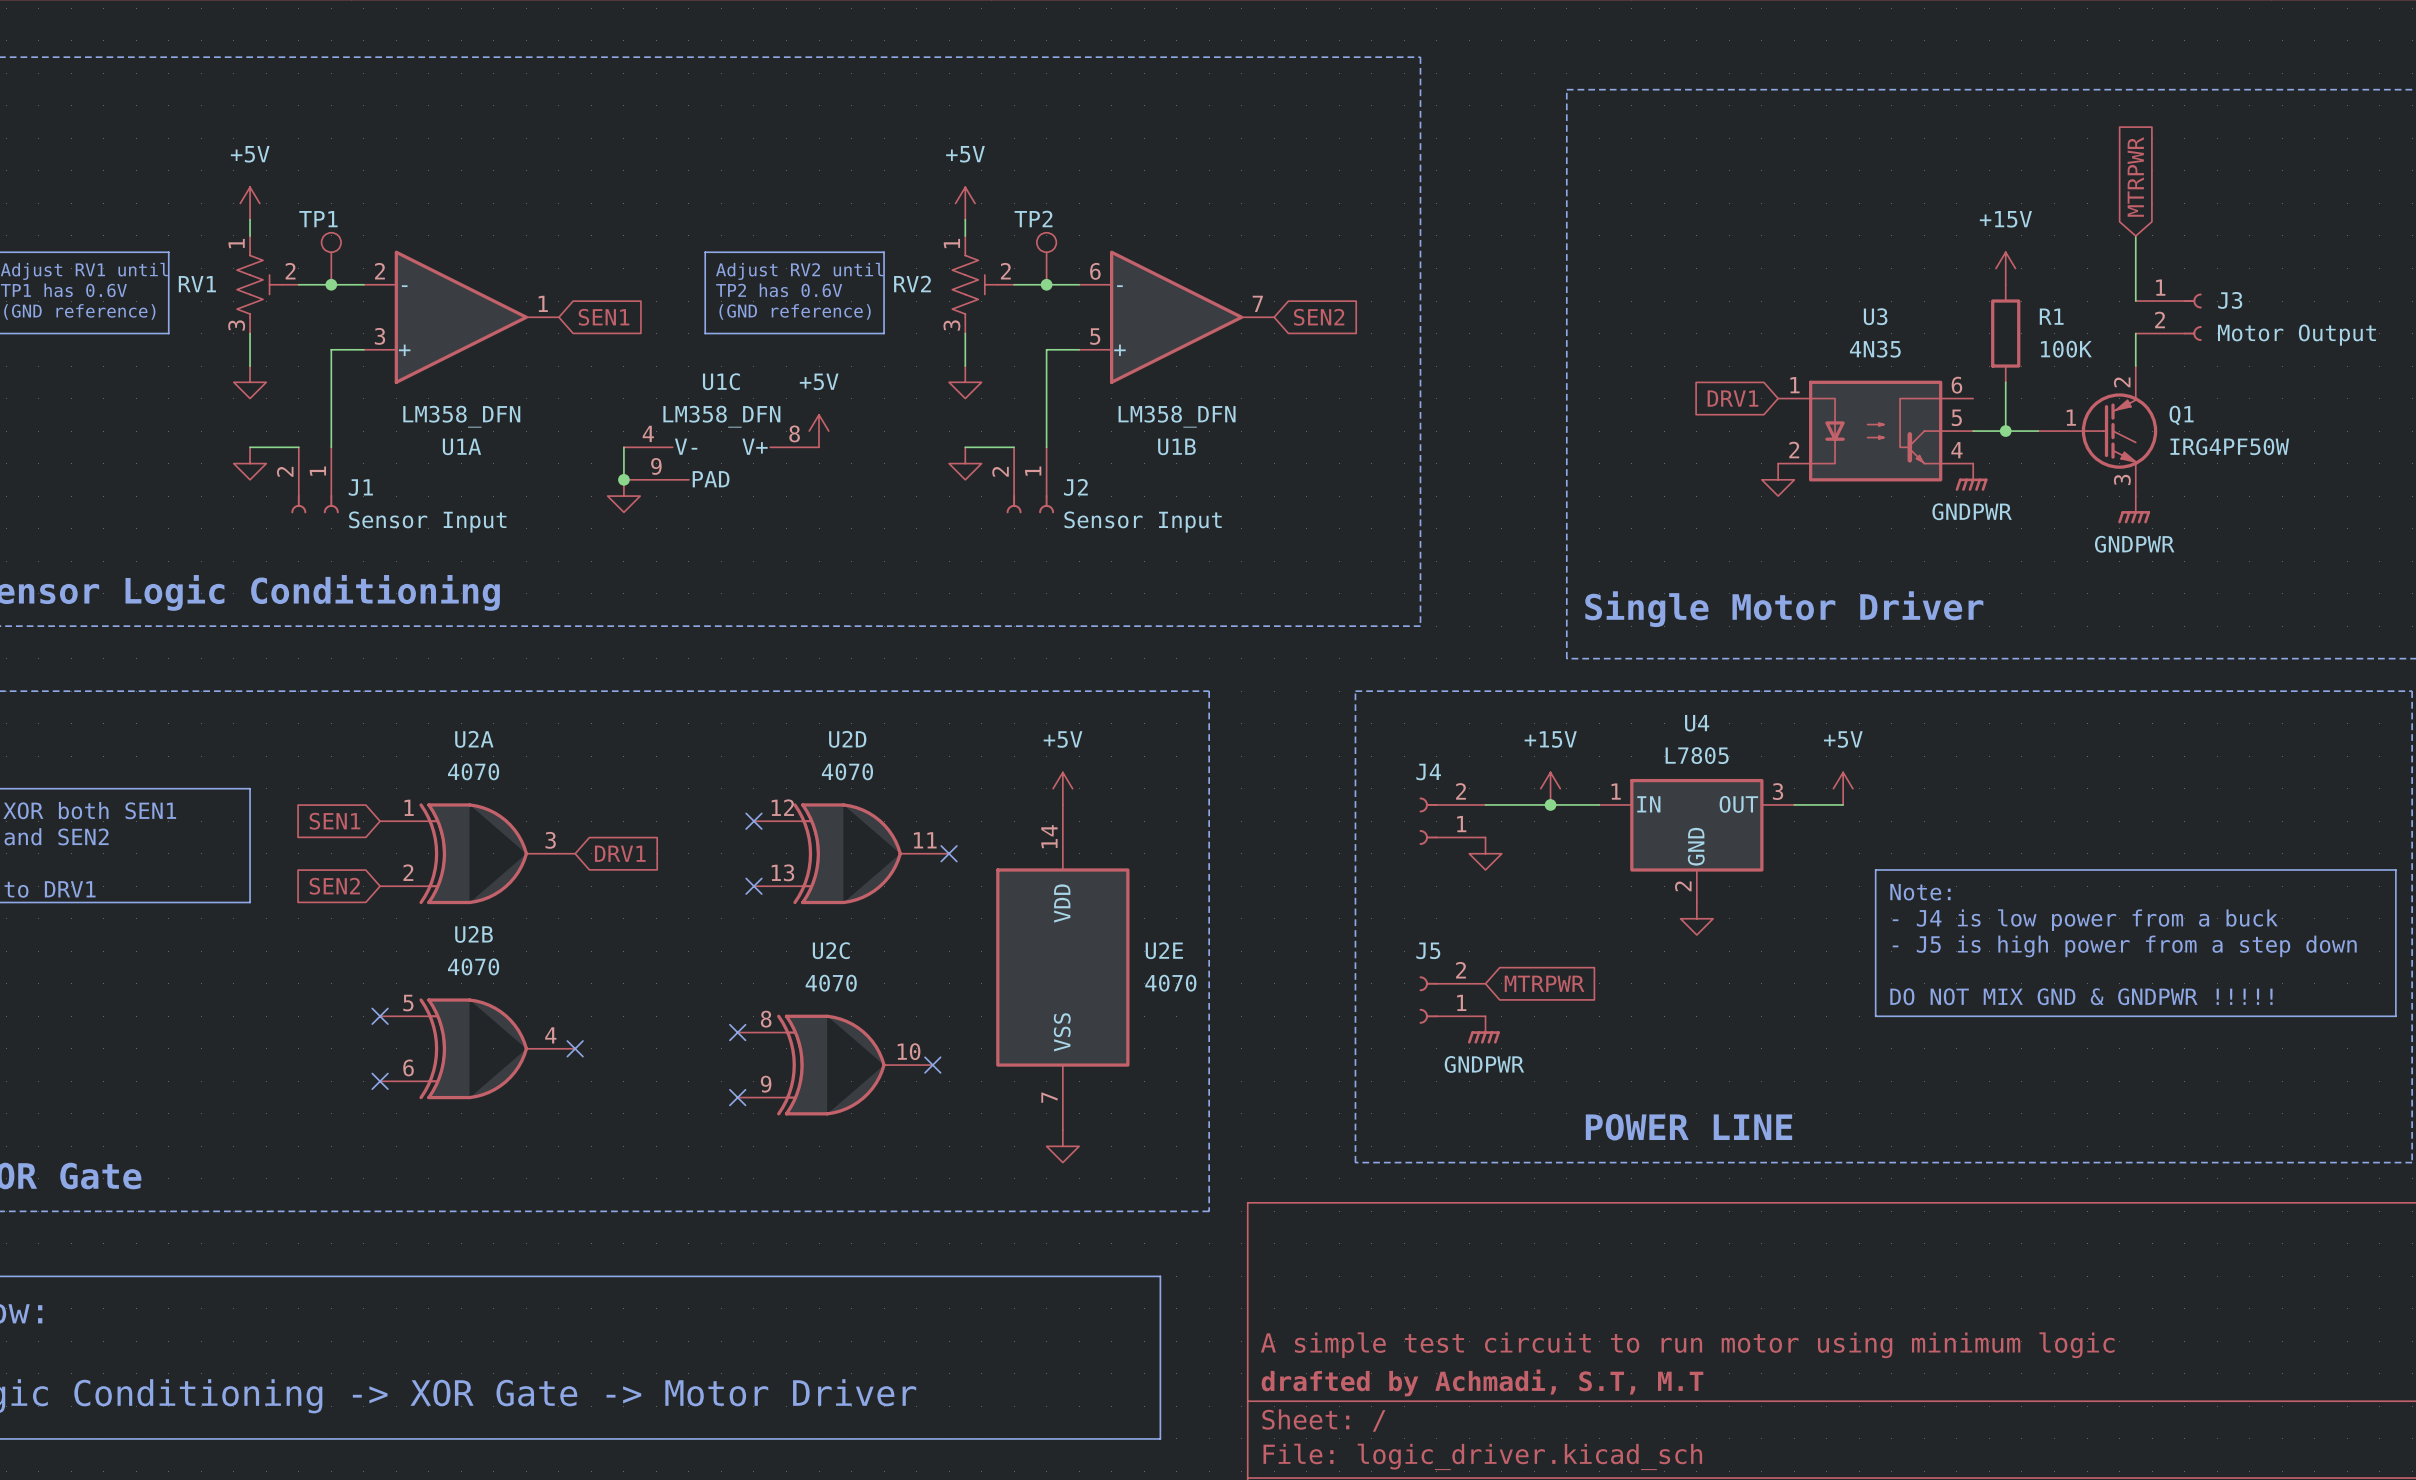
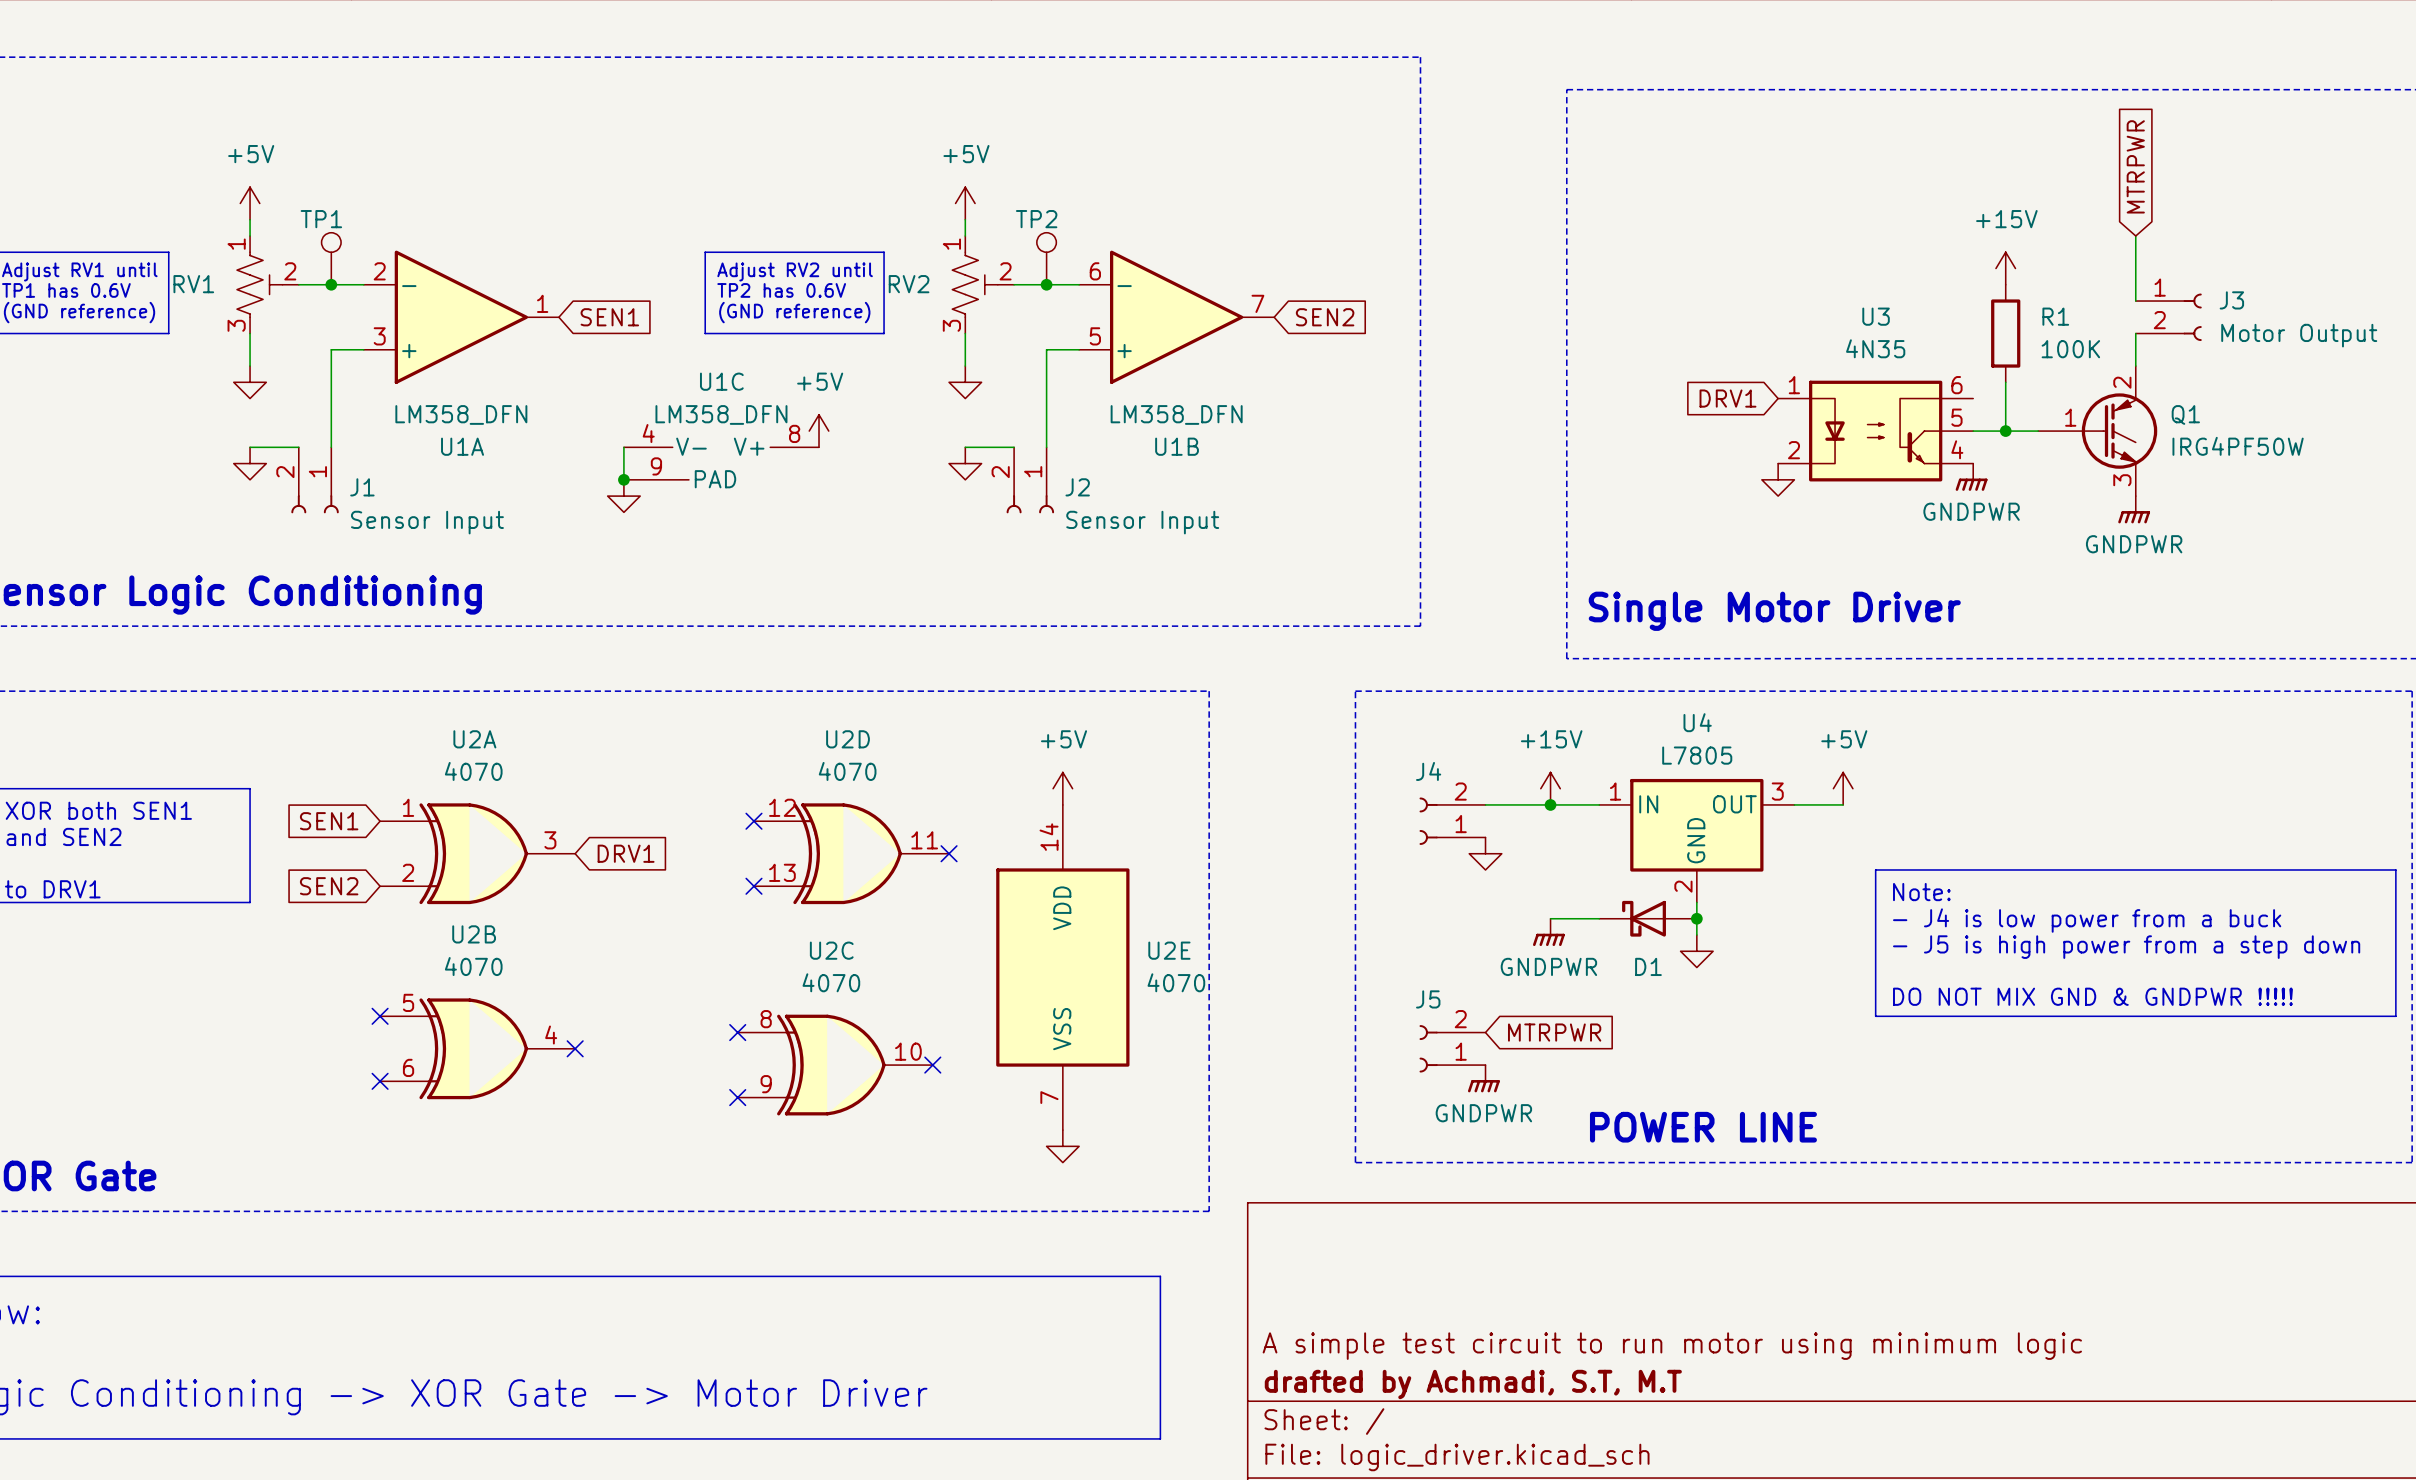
wire: none -> (1550, 918) (1599, 918)
D1: none -> (1648, 918)
power symbol position: (1696, 918) -> (1696, 951)
junction: none -> (1696, 918)
power symbol: none -> GNDPWR (1548, 932)
global label position: MTRPWR (1544, 983) -> MTRPWR (1554, 1032)
J5 position: (1452, 1000) -> (1452, 1048)
power symbol position: GNDPWR (1483, 1029) -> GNDPWR (1483, 1078)

